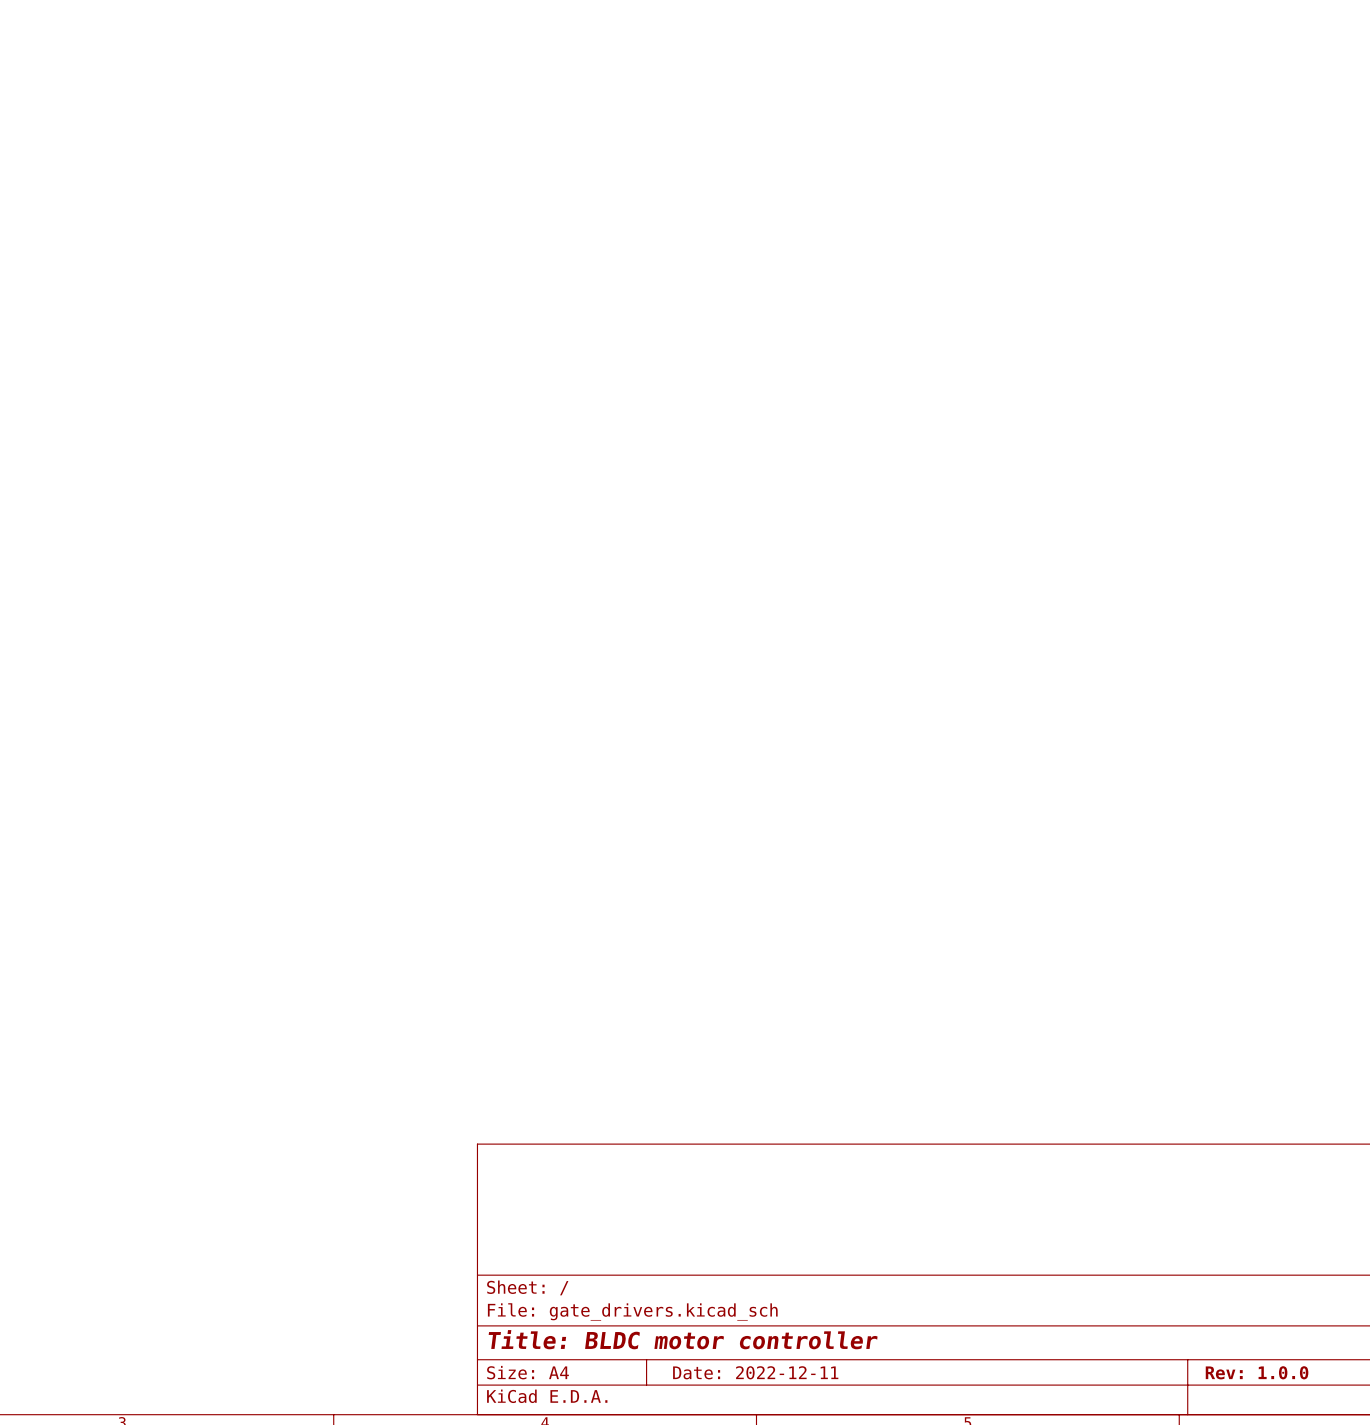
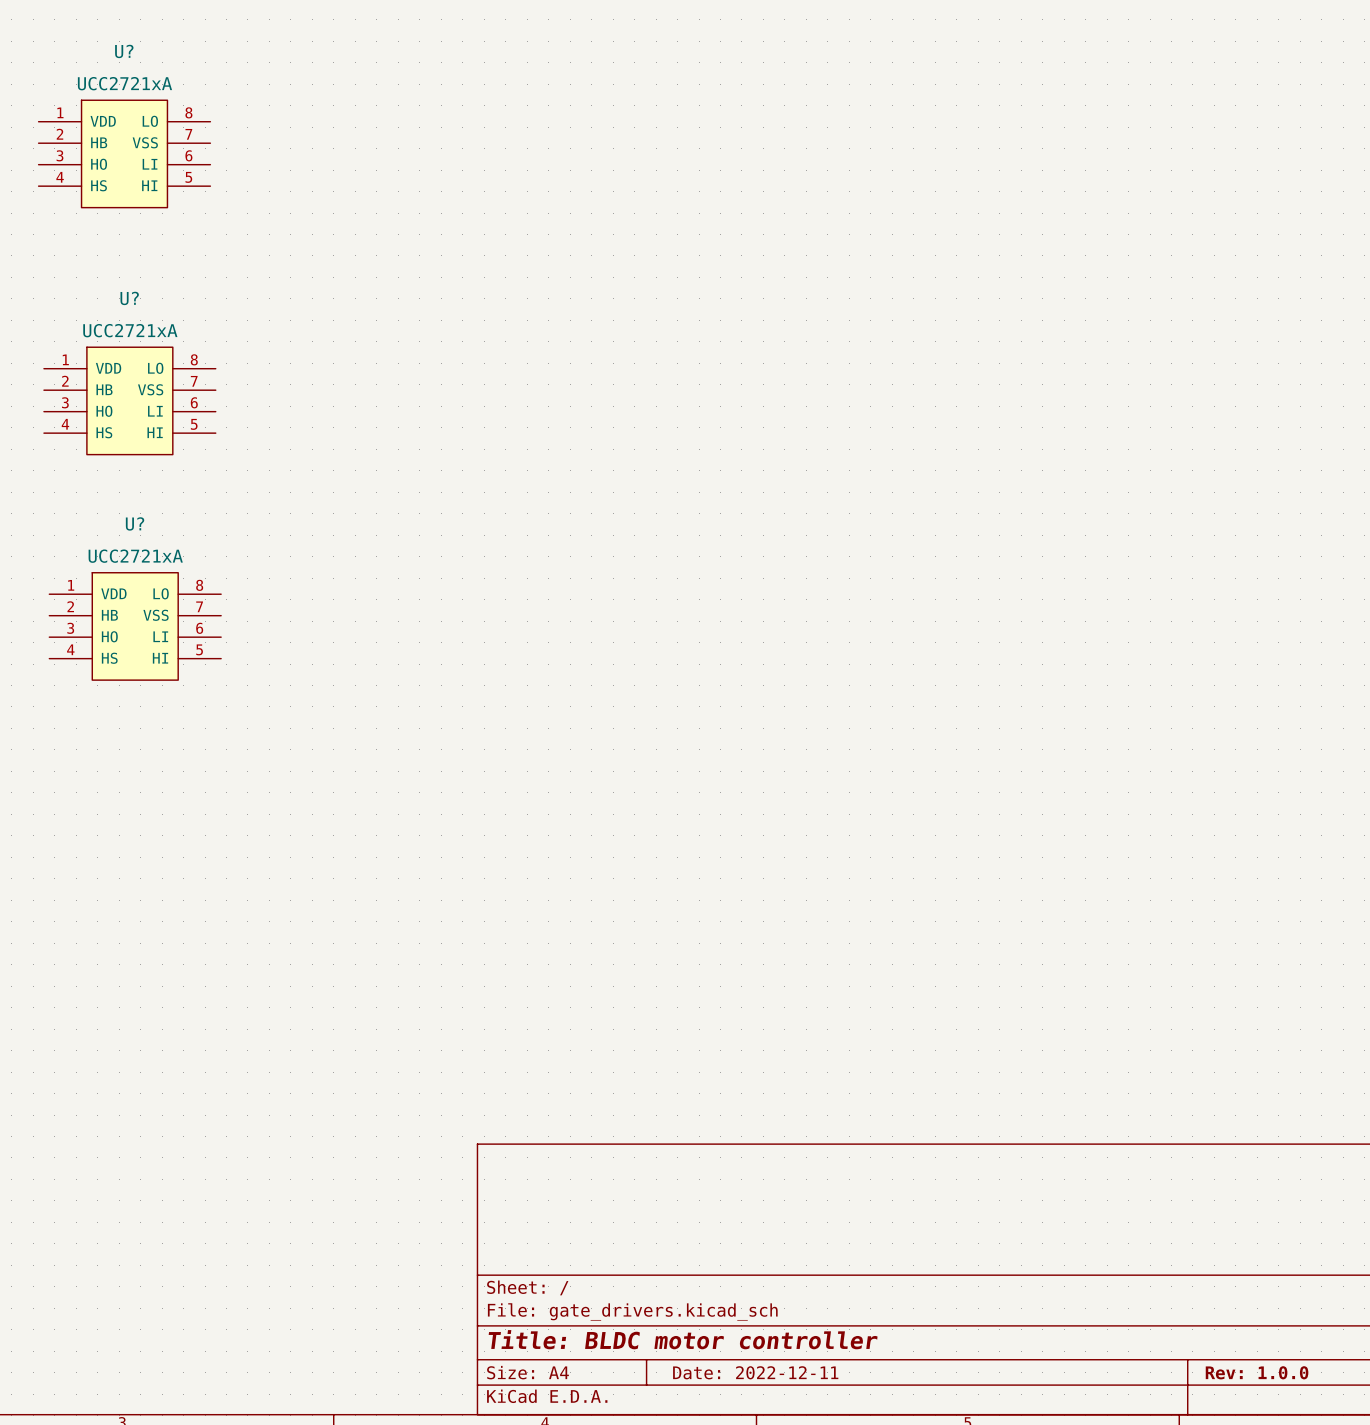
U?: none -> UCC2721xA (124, 153)
U?: none -> UCC2721xA (129, 400)
U?: none -> UCC2721xA (135, 626)

